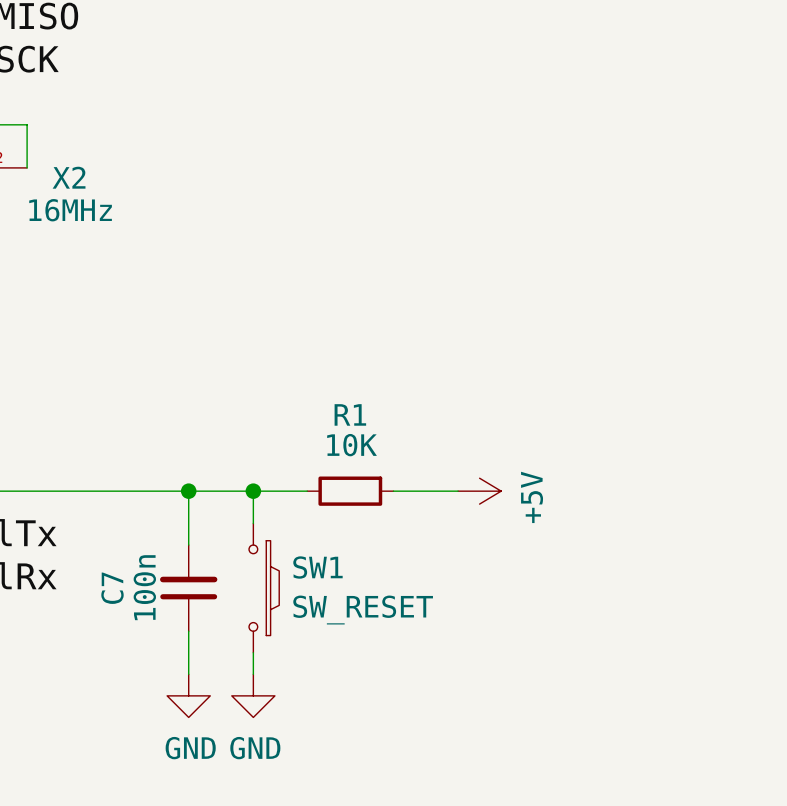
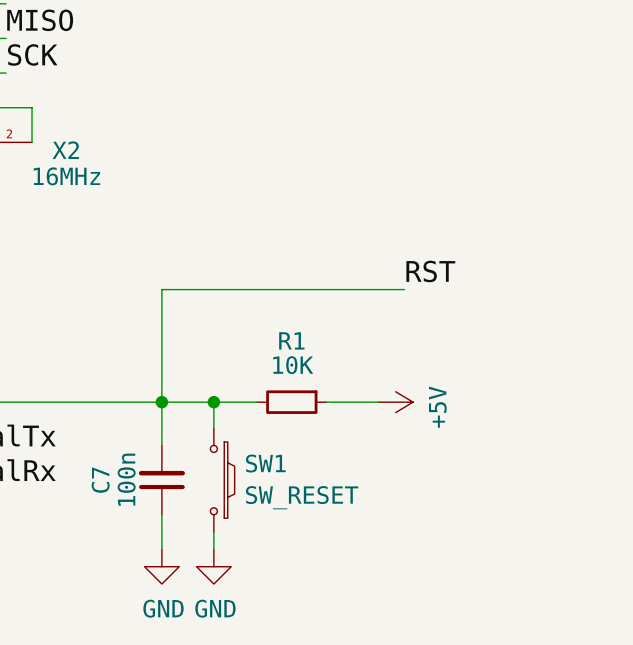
label: none -> RST (430, 271)
wire: none -> (404, 289) (161, 289) (161, 402)

